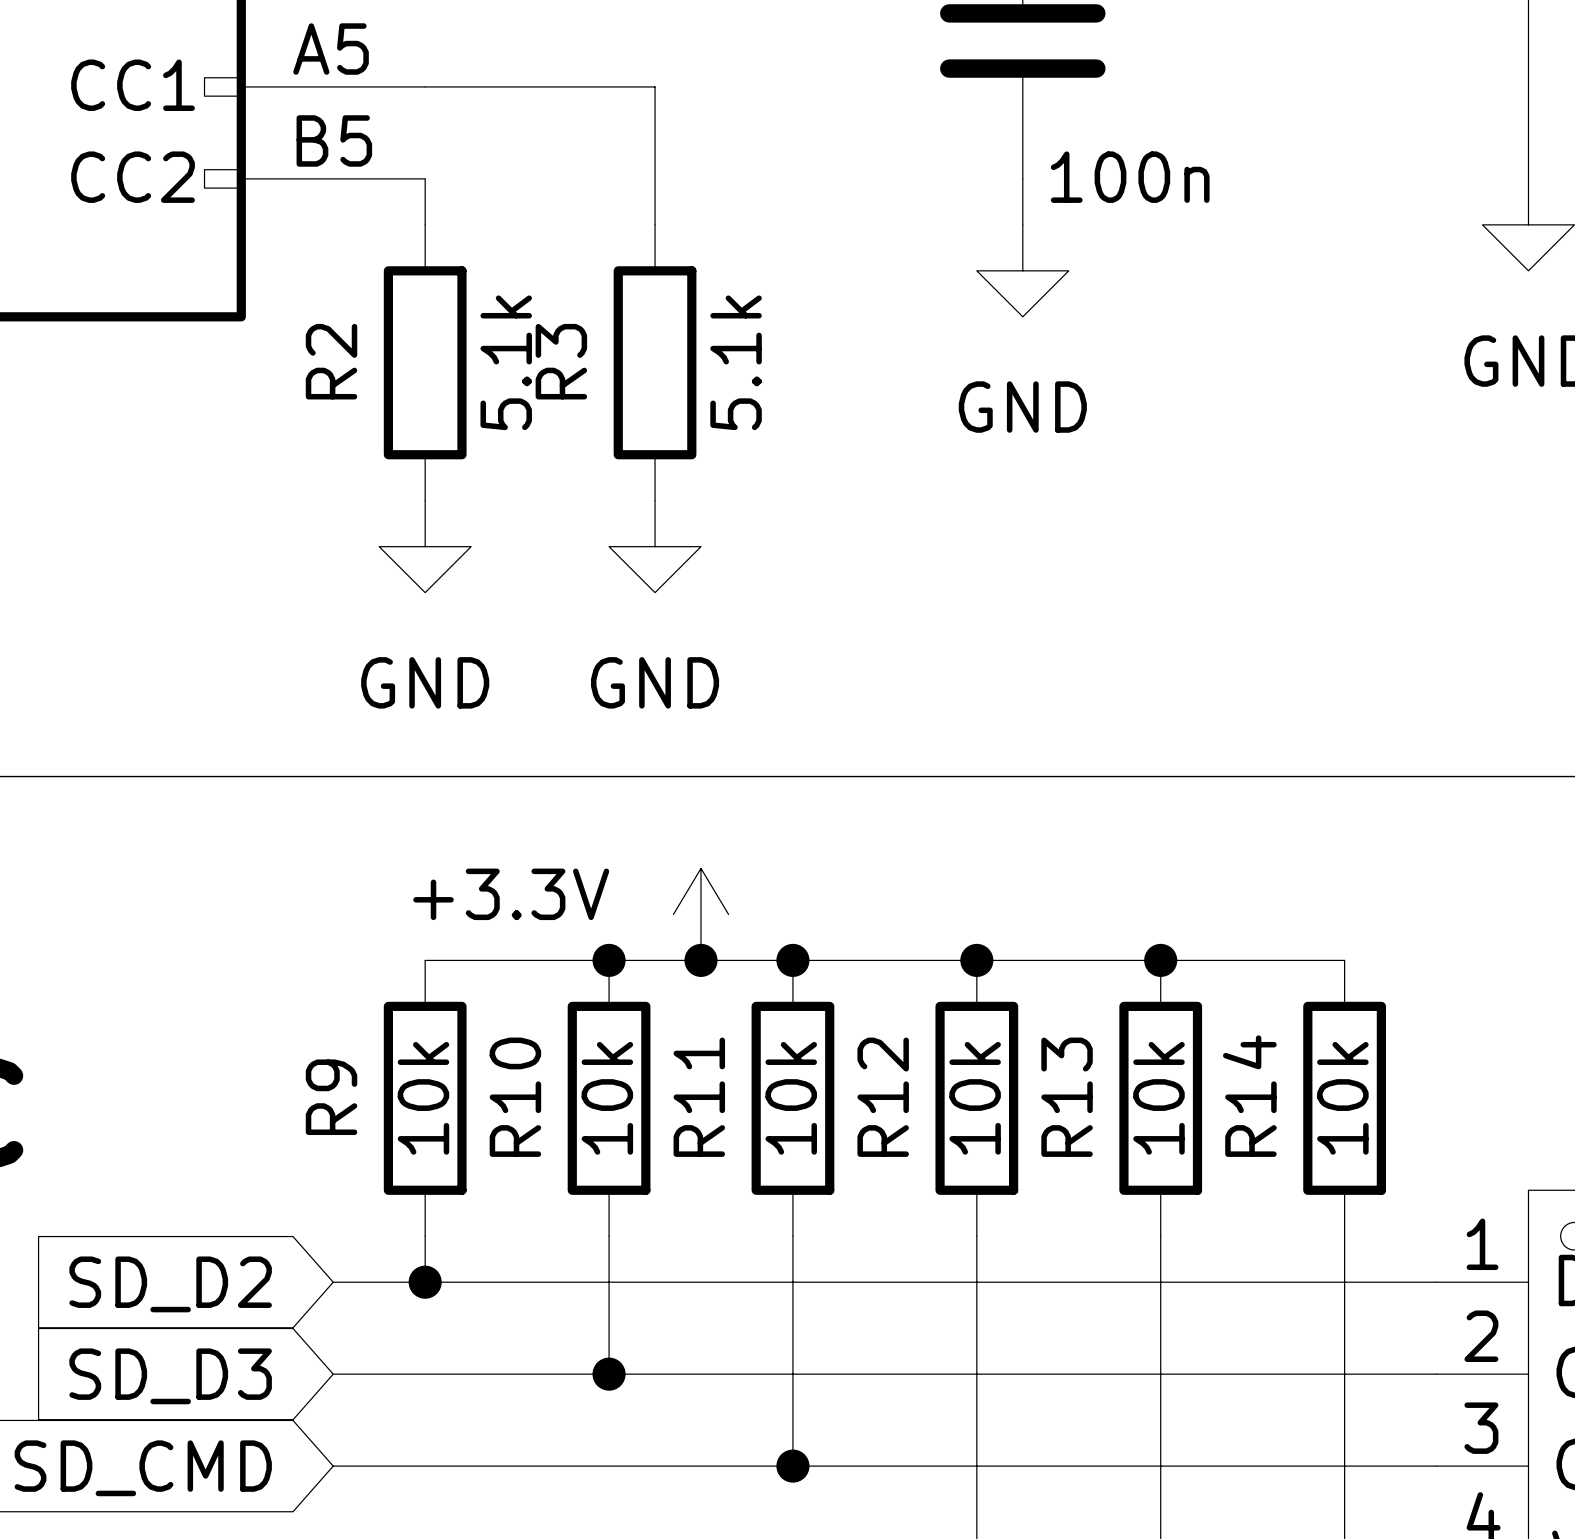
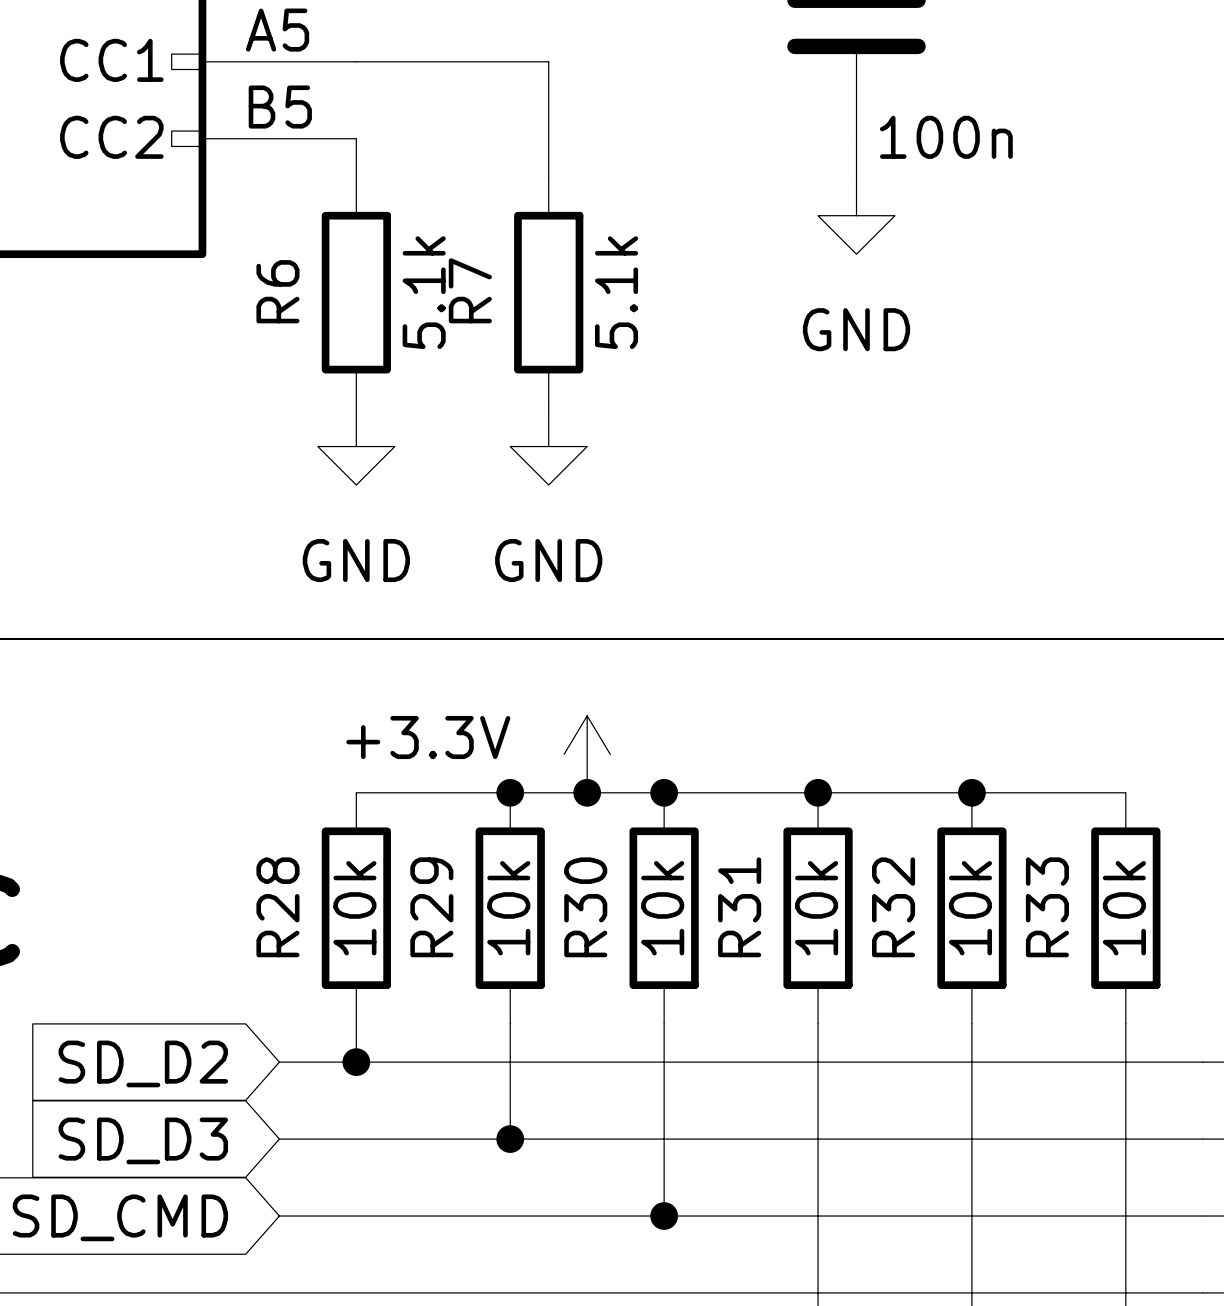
R2 name: R2 (331, 361) -> R6 (277, 291)
R3 name: R3 (561, 361) -> R7 (470, 290)
R14 name: R14 (1249, 1096) -> R33 (1047, 907)
R9 name: R9 (331, 1097) -> R28 (277, 907)
R10 name: R10 (515, 1097) -> R29 (431, 907)
R11 name: R11 (699, 1097) -> R30 (585, 907)
R12 name: R12 (883, 1097) -> R31 (739, 907)
R13 name: R13 (1067, 1097) -> R32 (893, 907)

